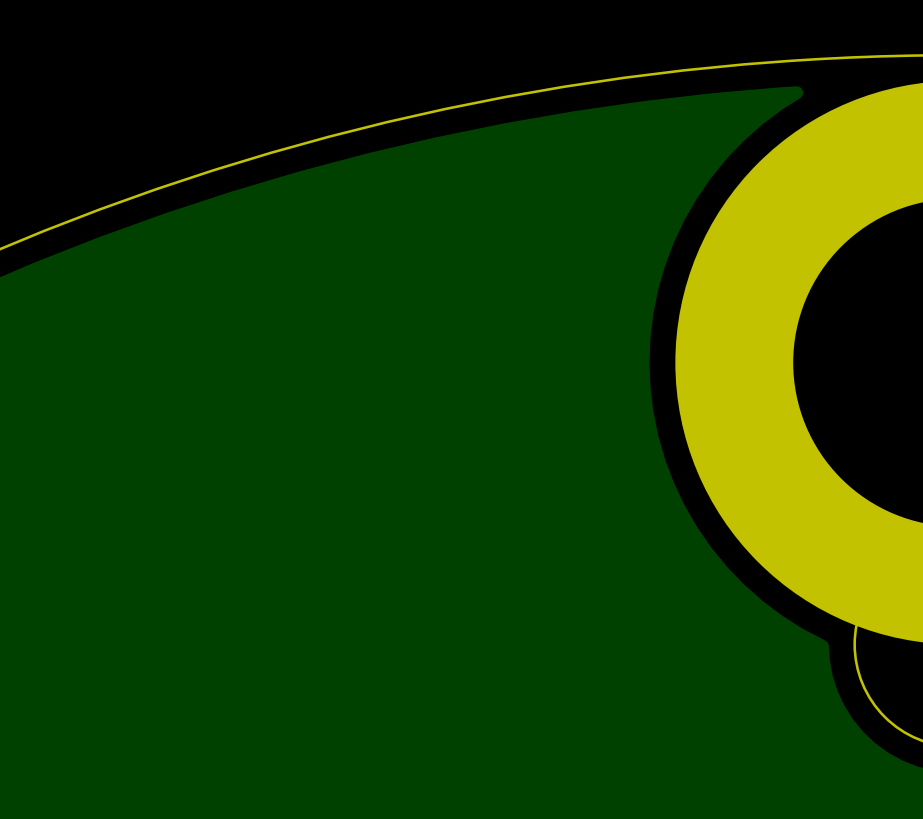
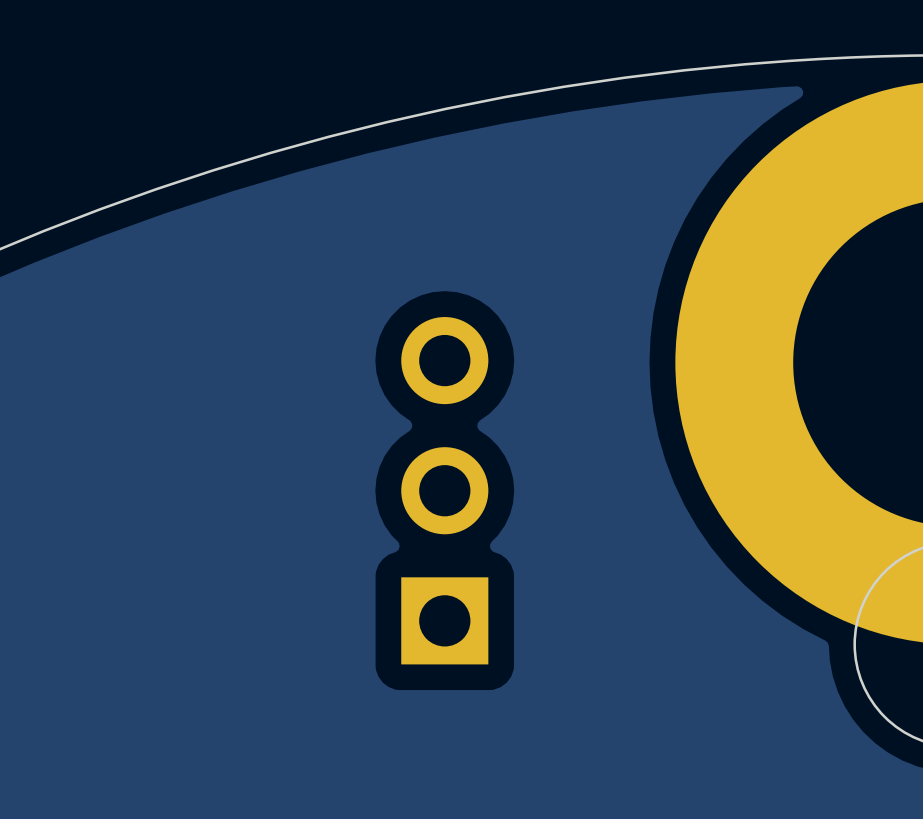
part: none -> (444, 490)

